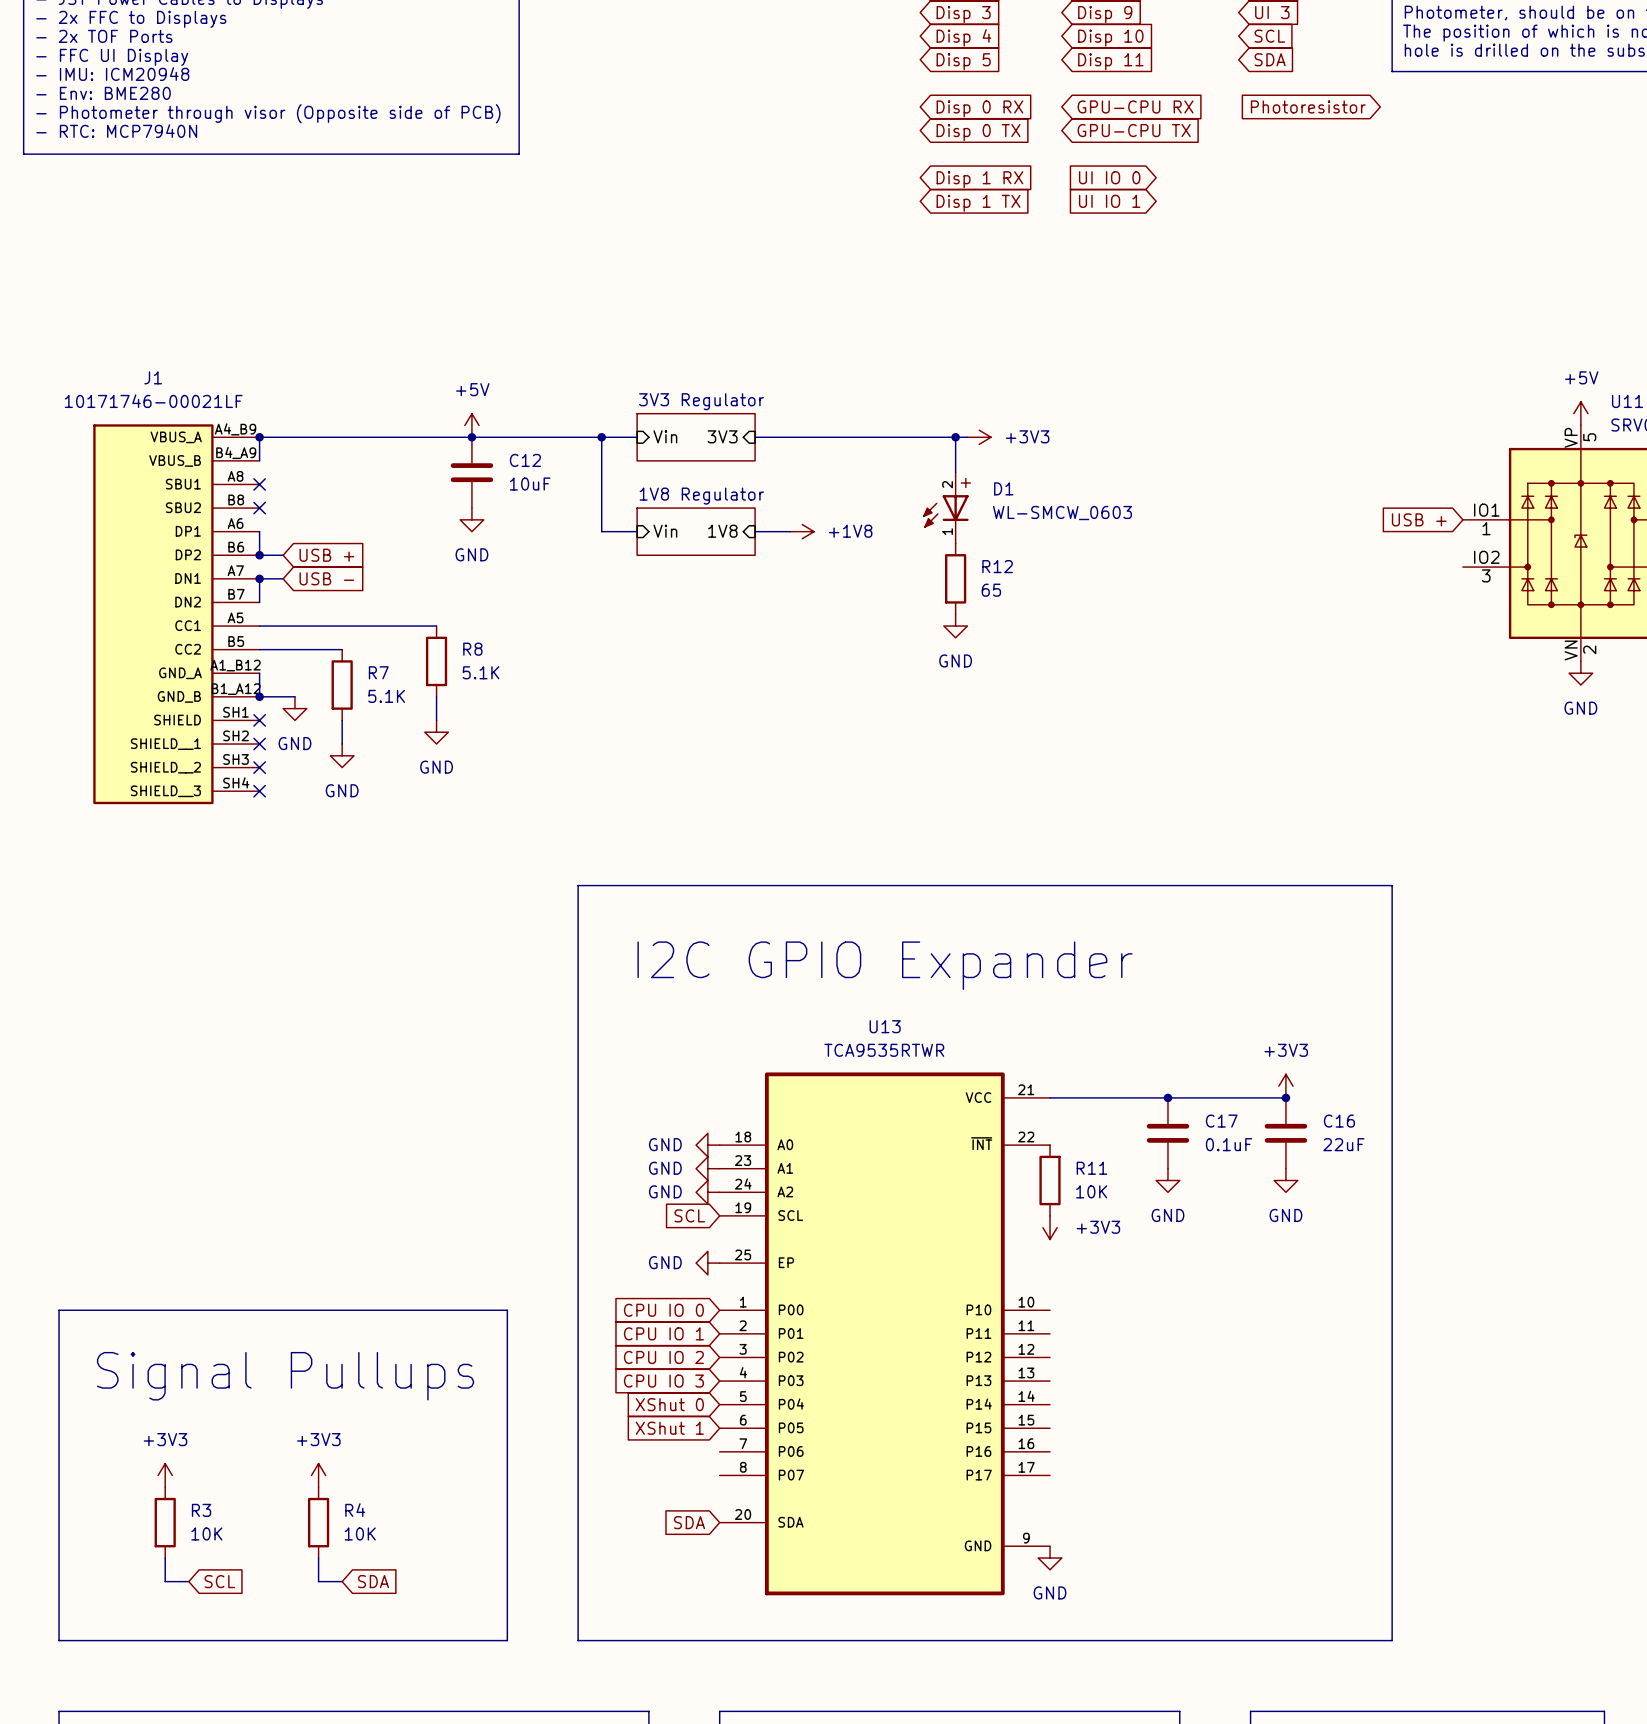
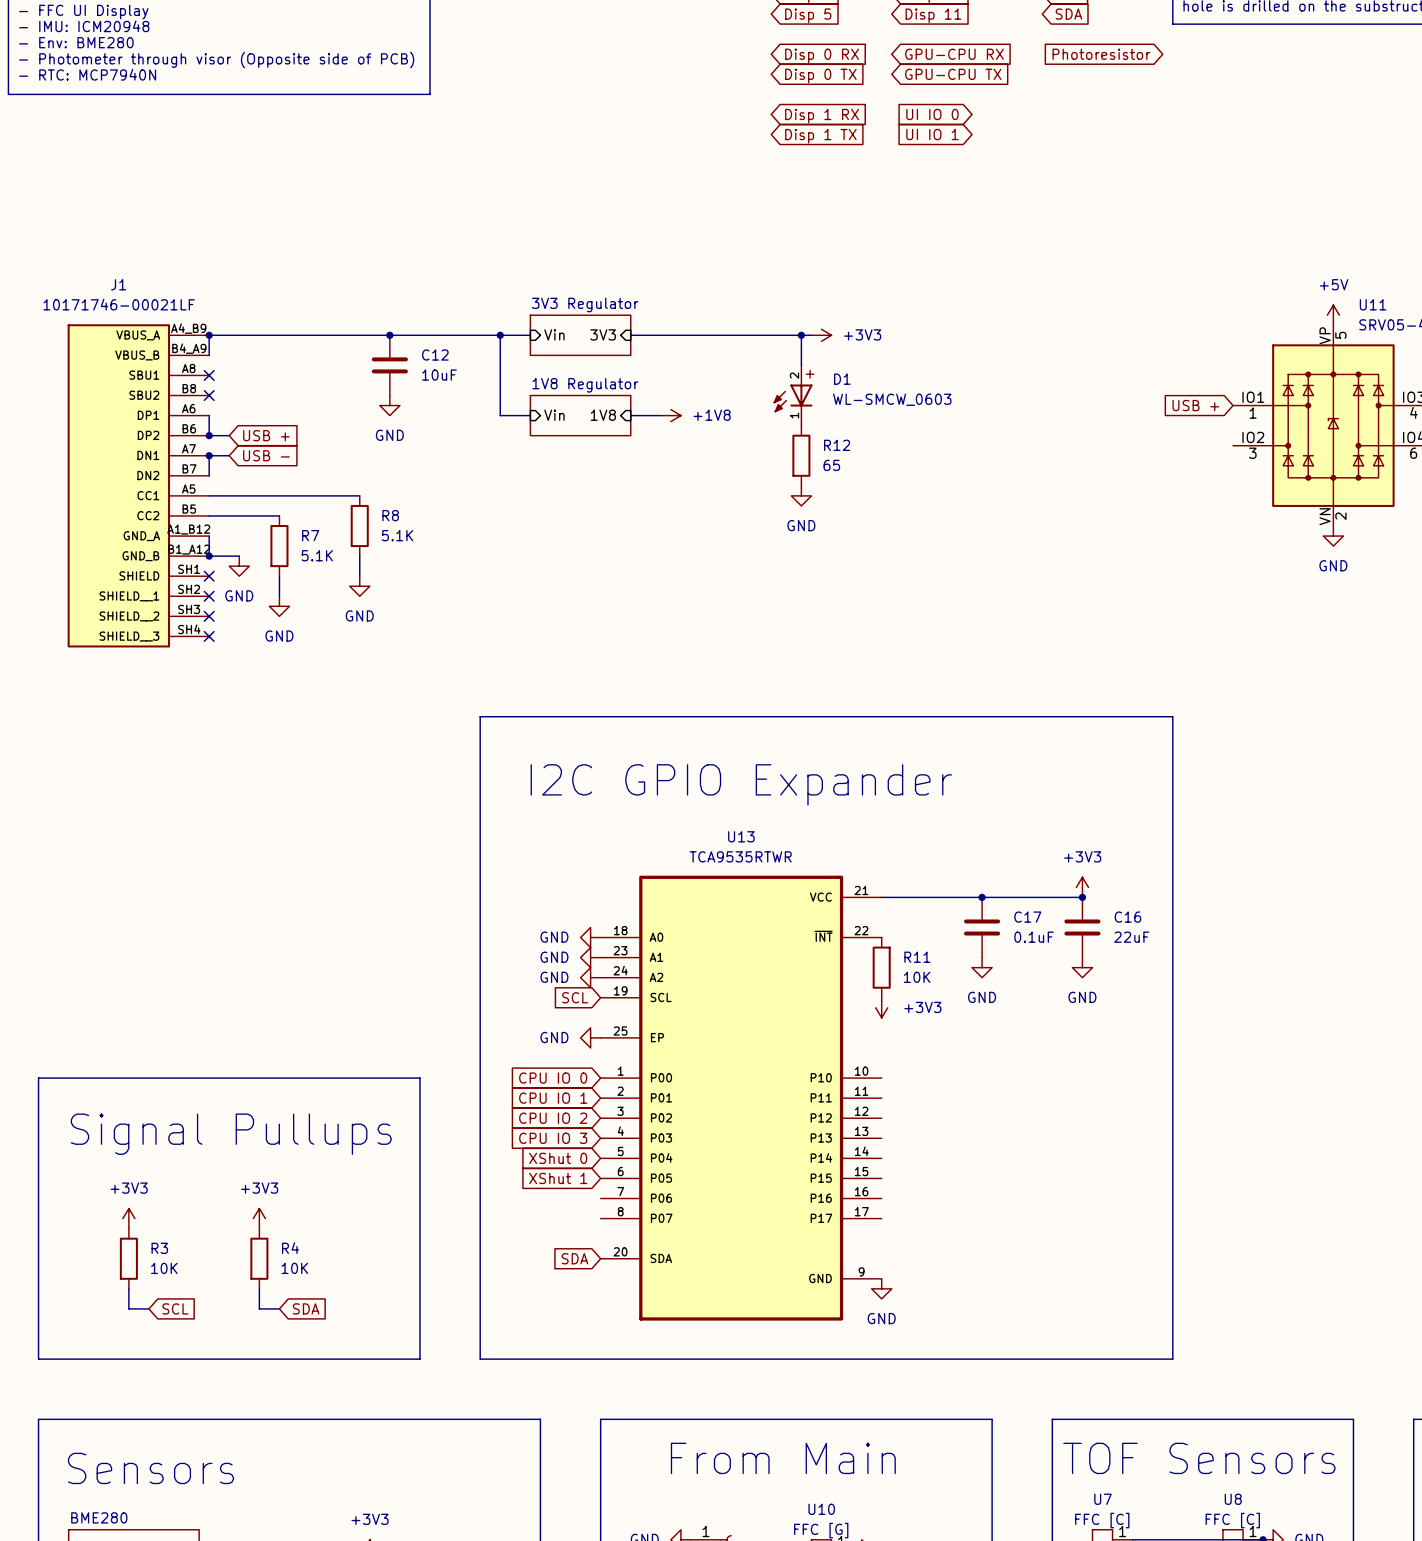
power symbol: +5V (471, 425) -> none

